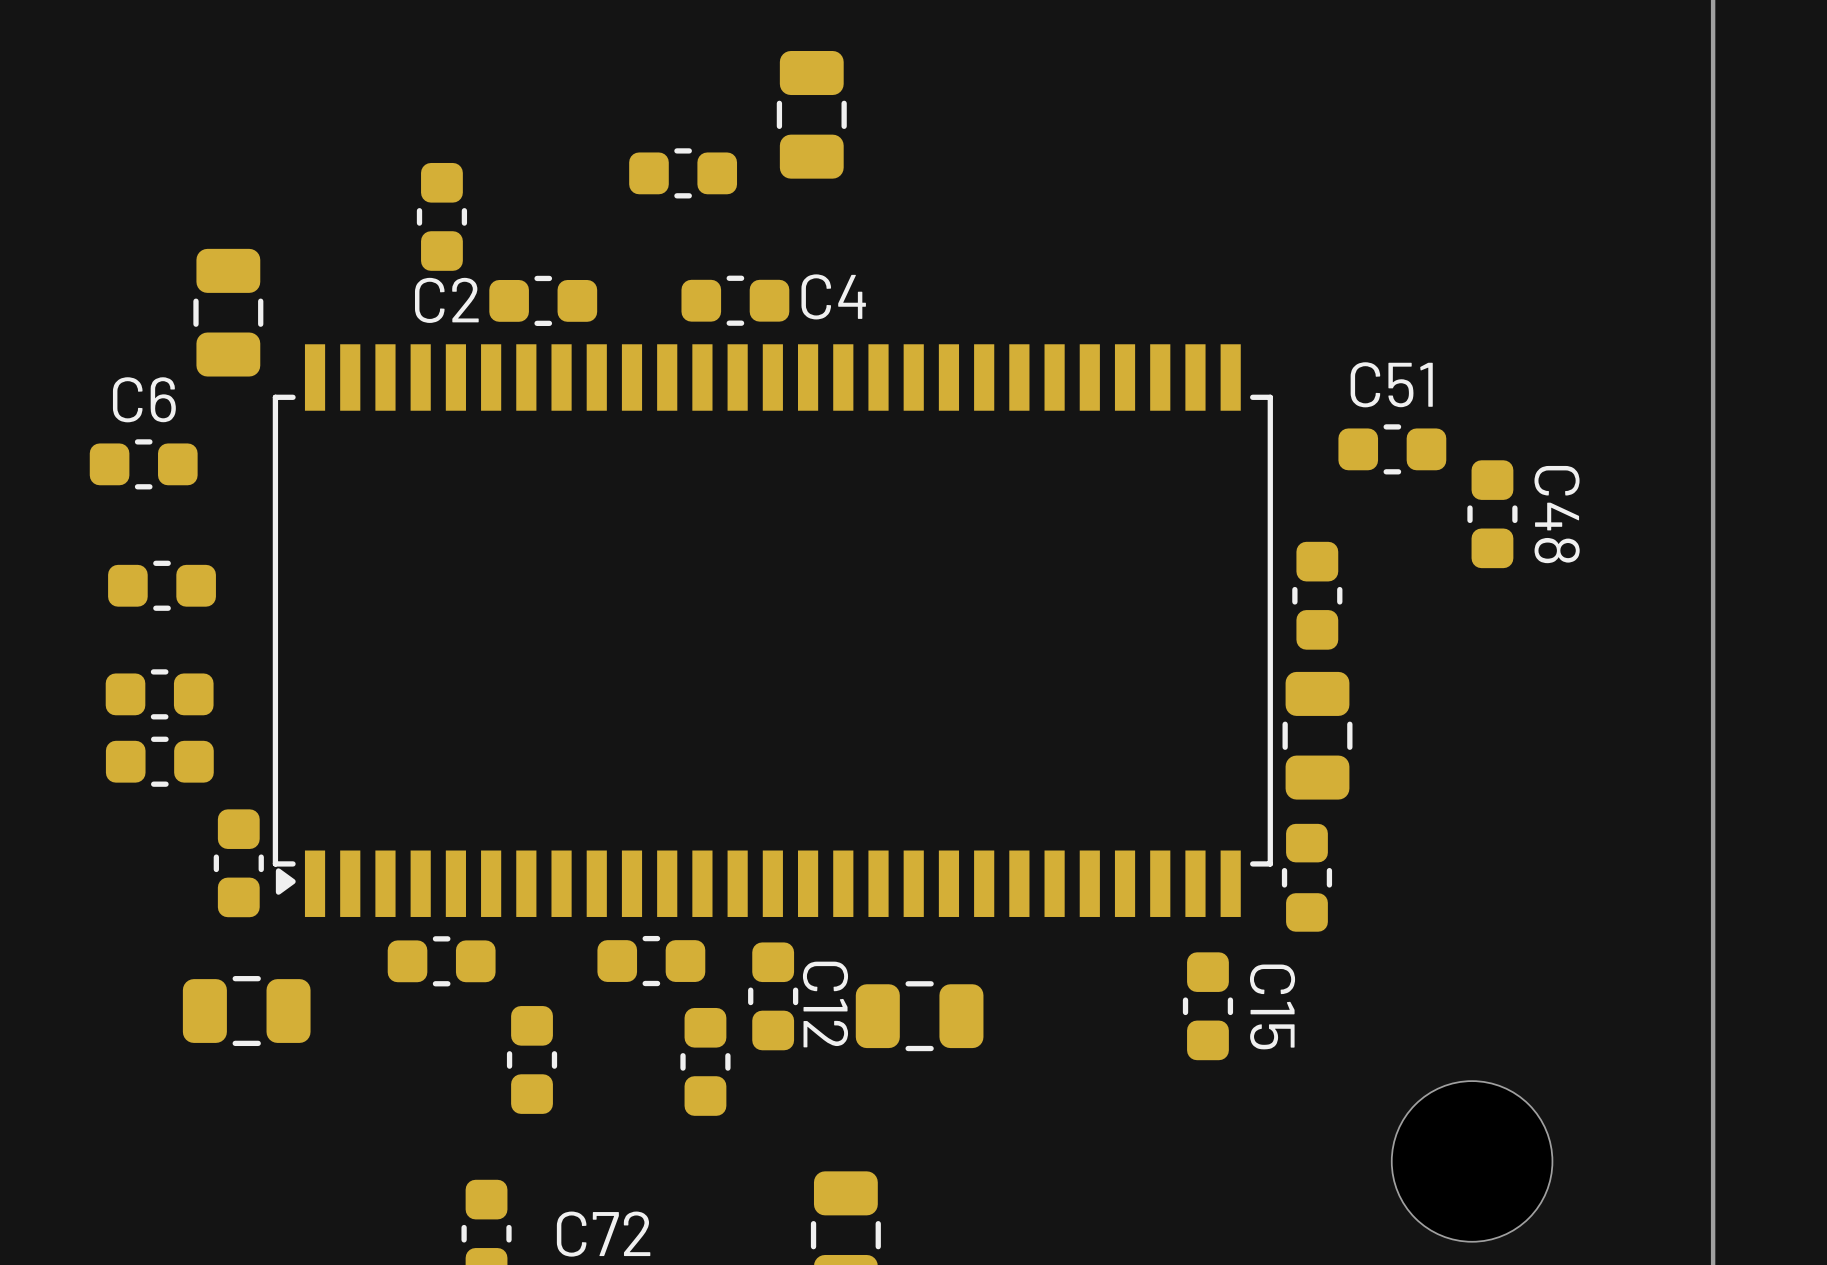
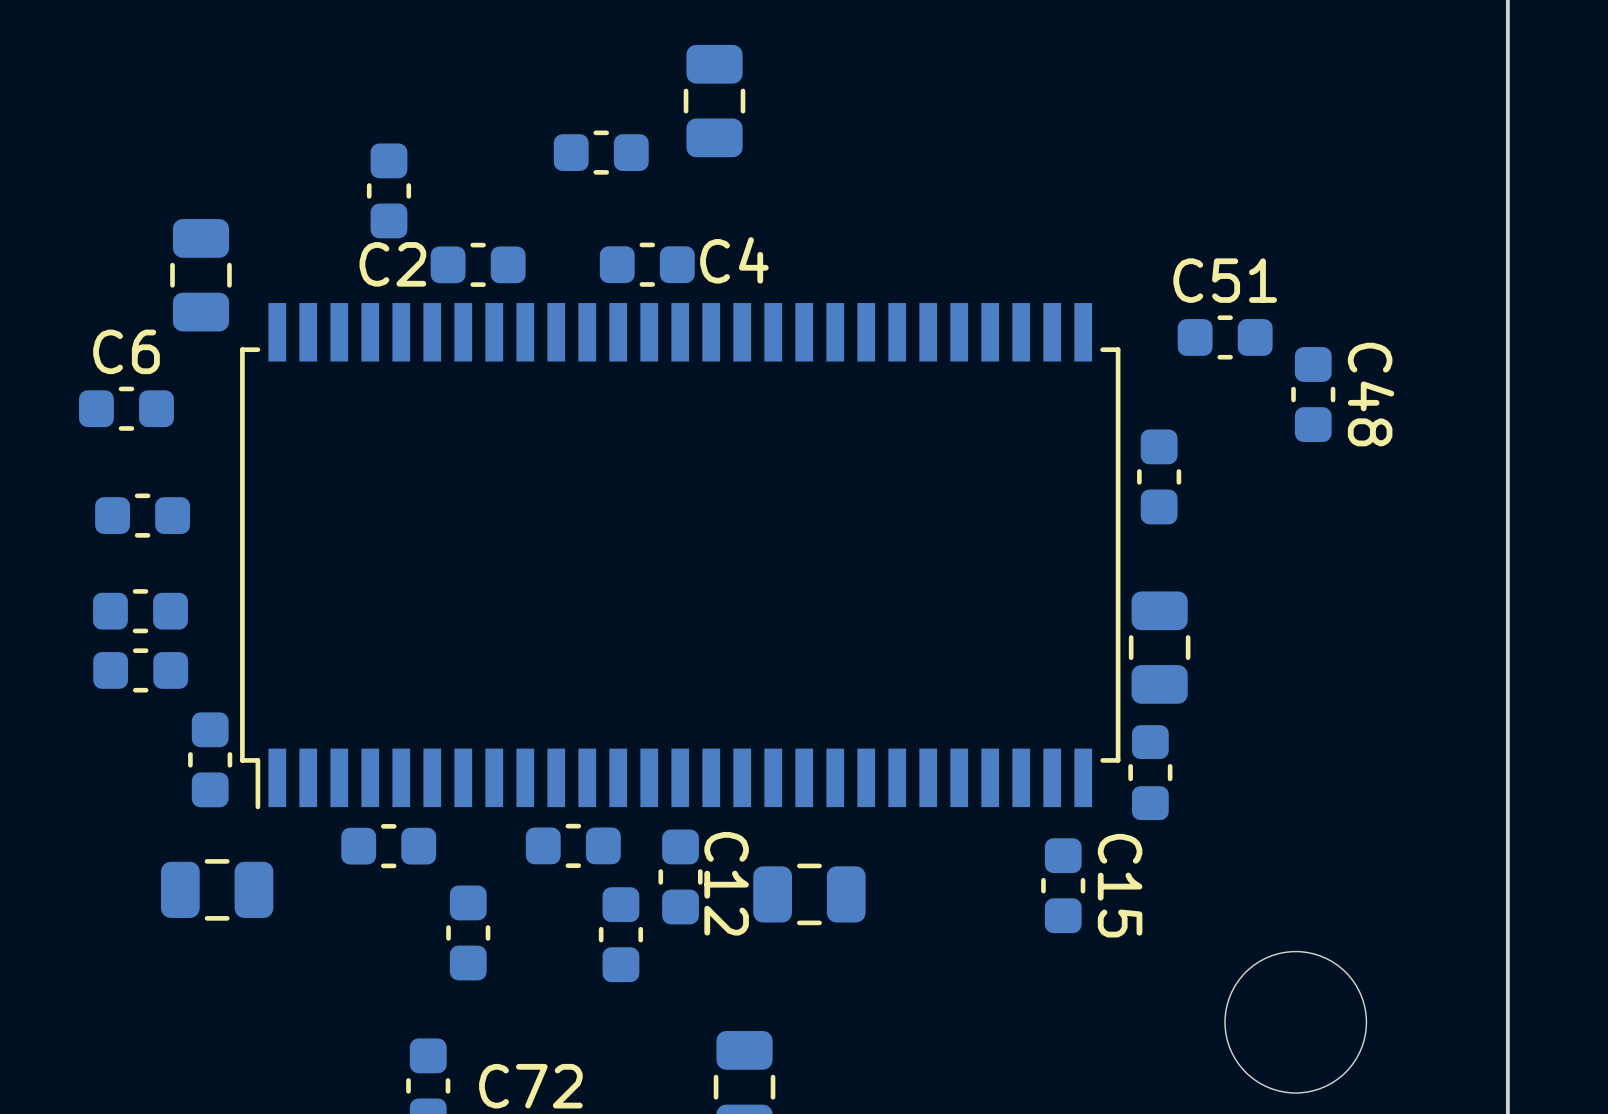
part footprint: [272, 344, 1273, 917] -> [240, 303, 1121, 810]
C51 position: (1392, 449) -> (1225, 337)
C48 position: (1492, 514) -> (1313, 394)
part position: (1317, 595) -> (1159, 476)

